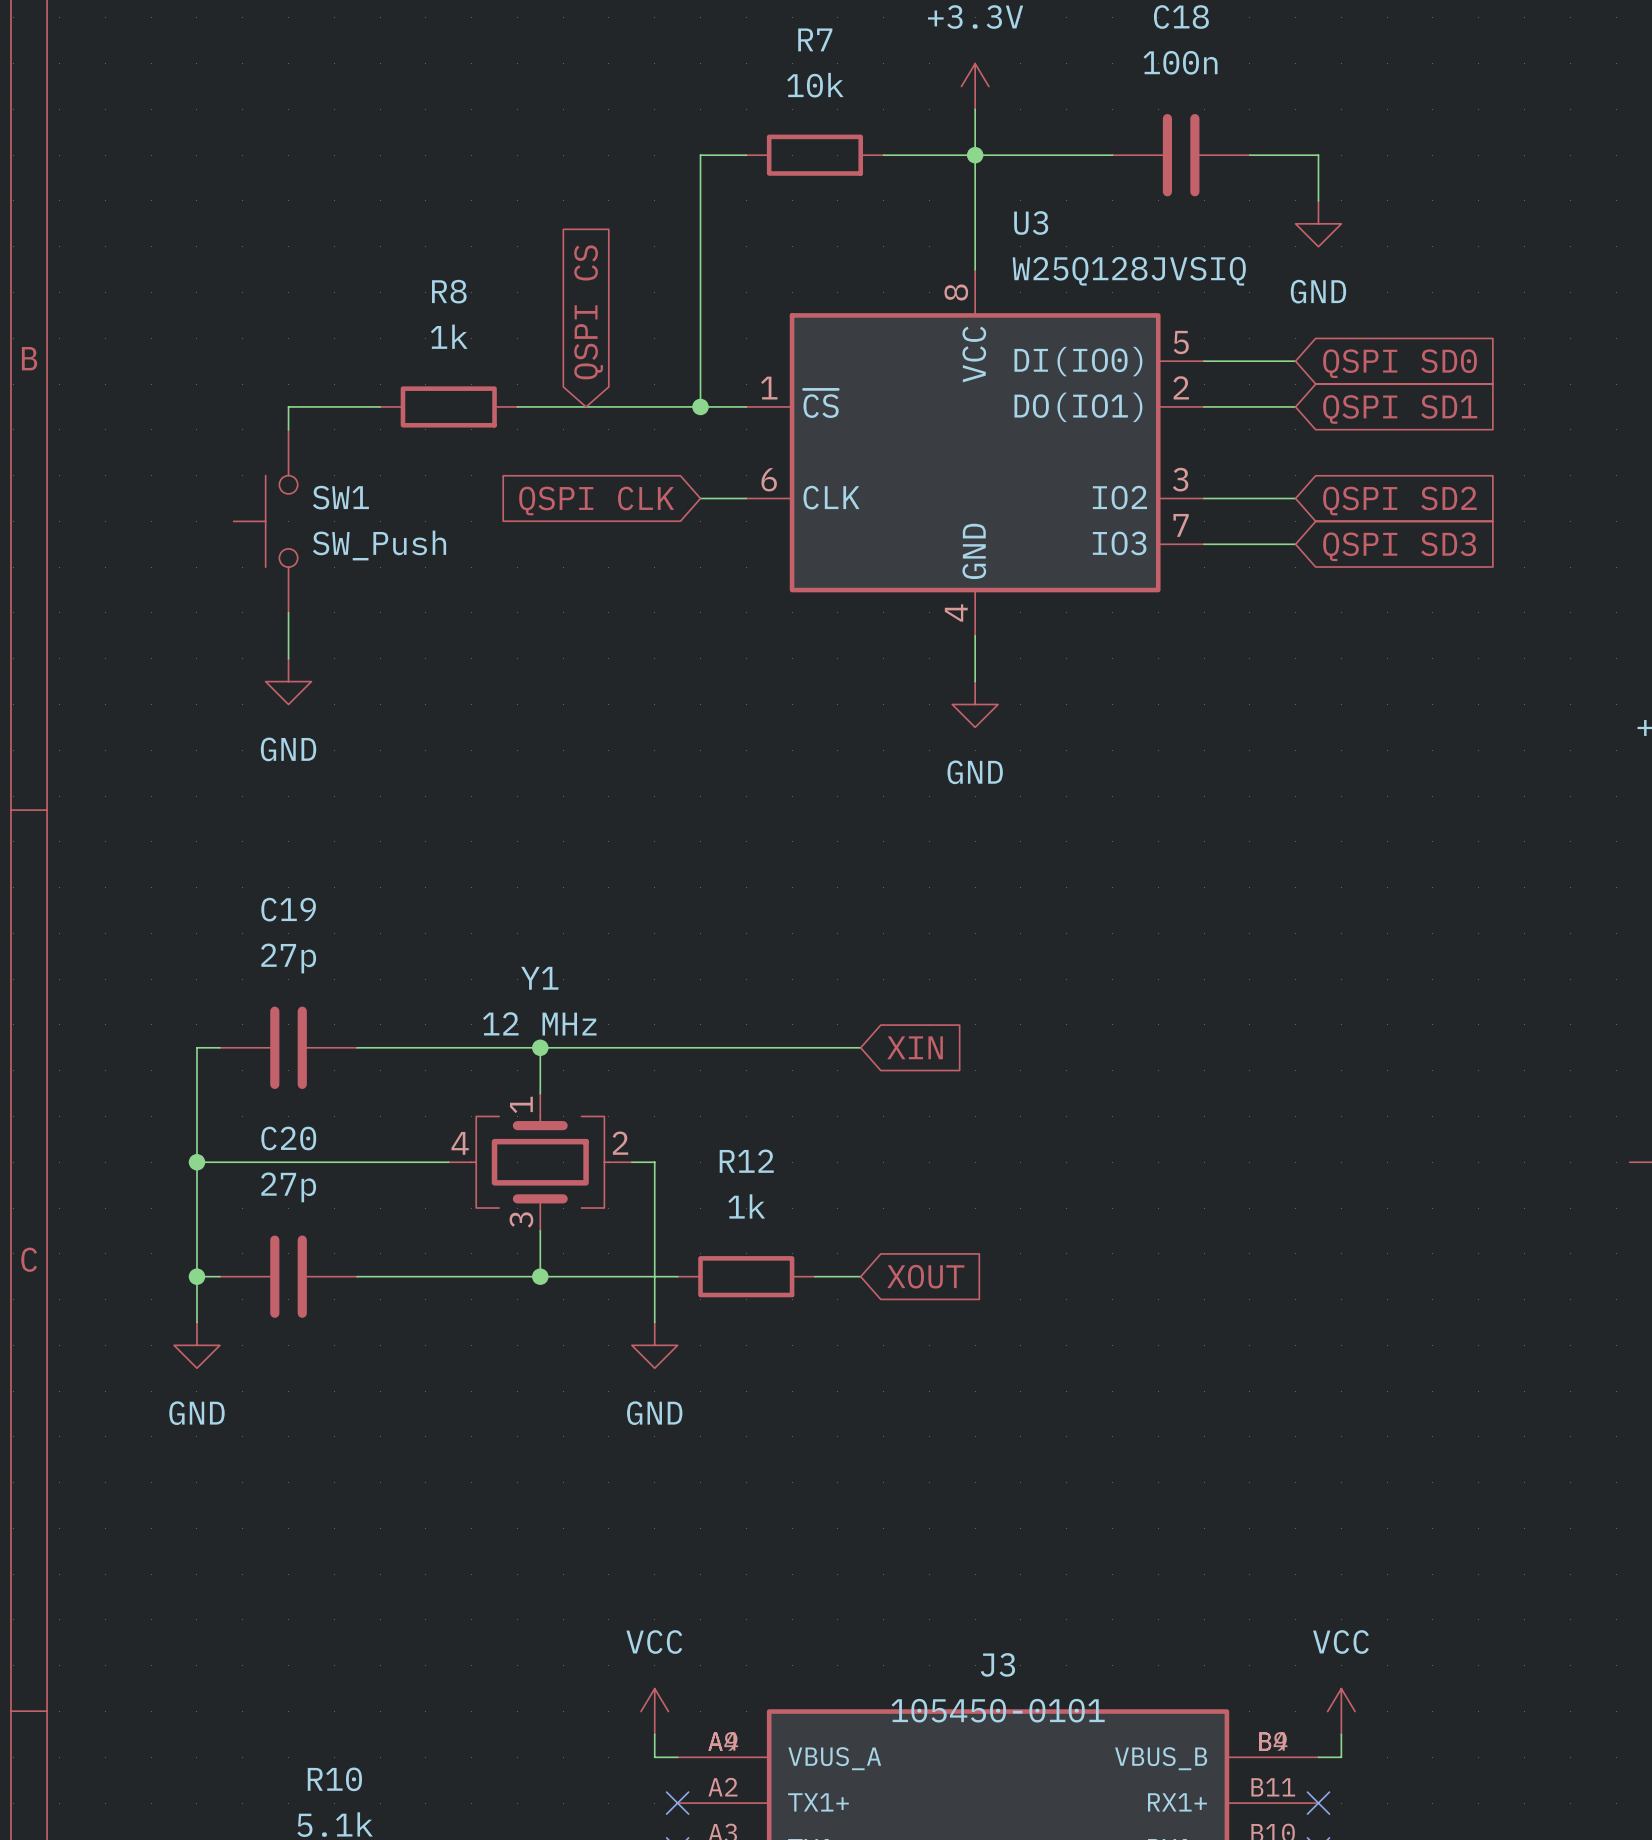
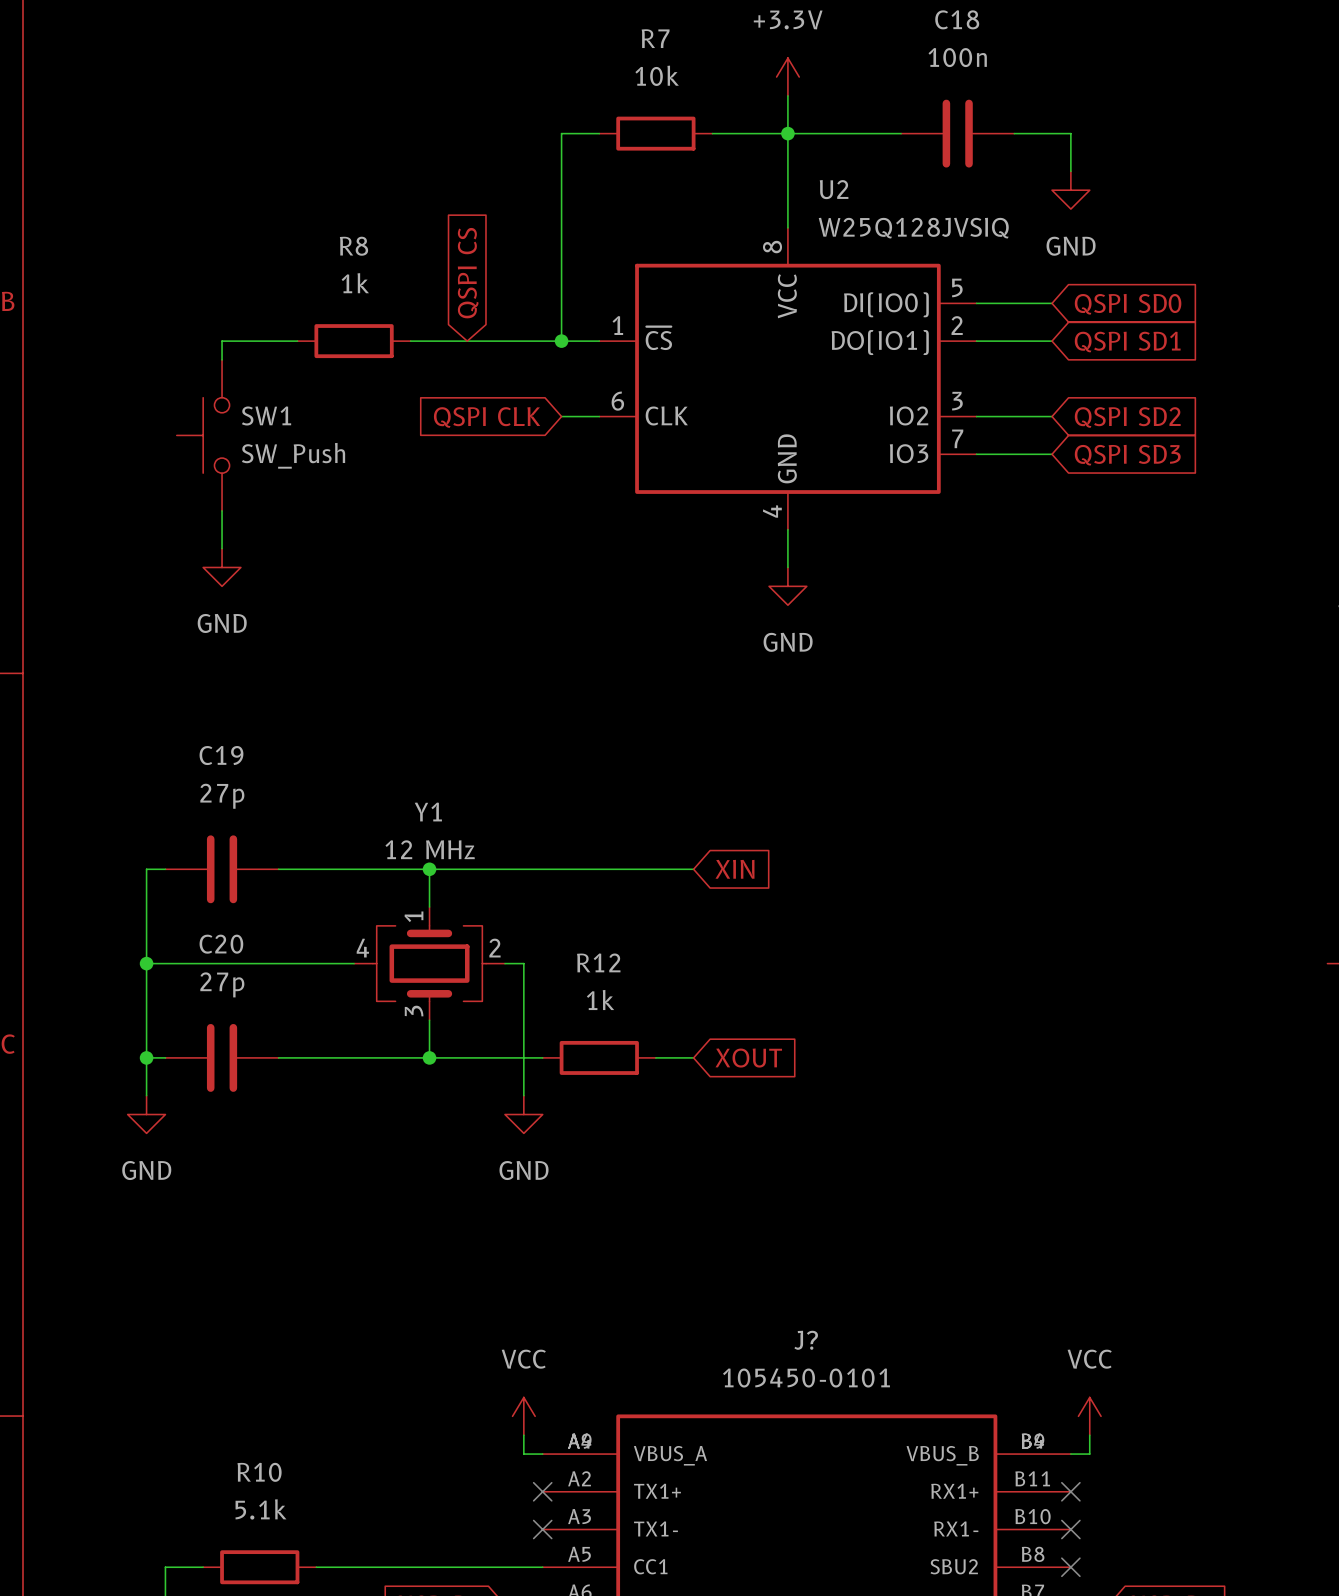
U3 name: U3 (1031, 222) -> U2 (834, 189)
J3 name: J3 (997, 1664) -> J? (806, 1340)
J3 value position: 105450-0101 (998, 1710) -> 105450-0101 (806, 1378)

